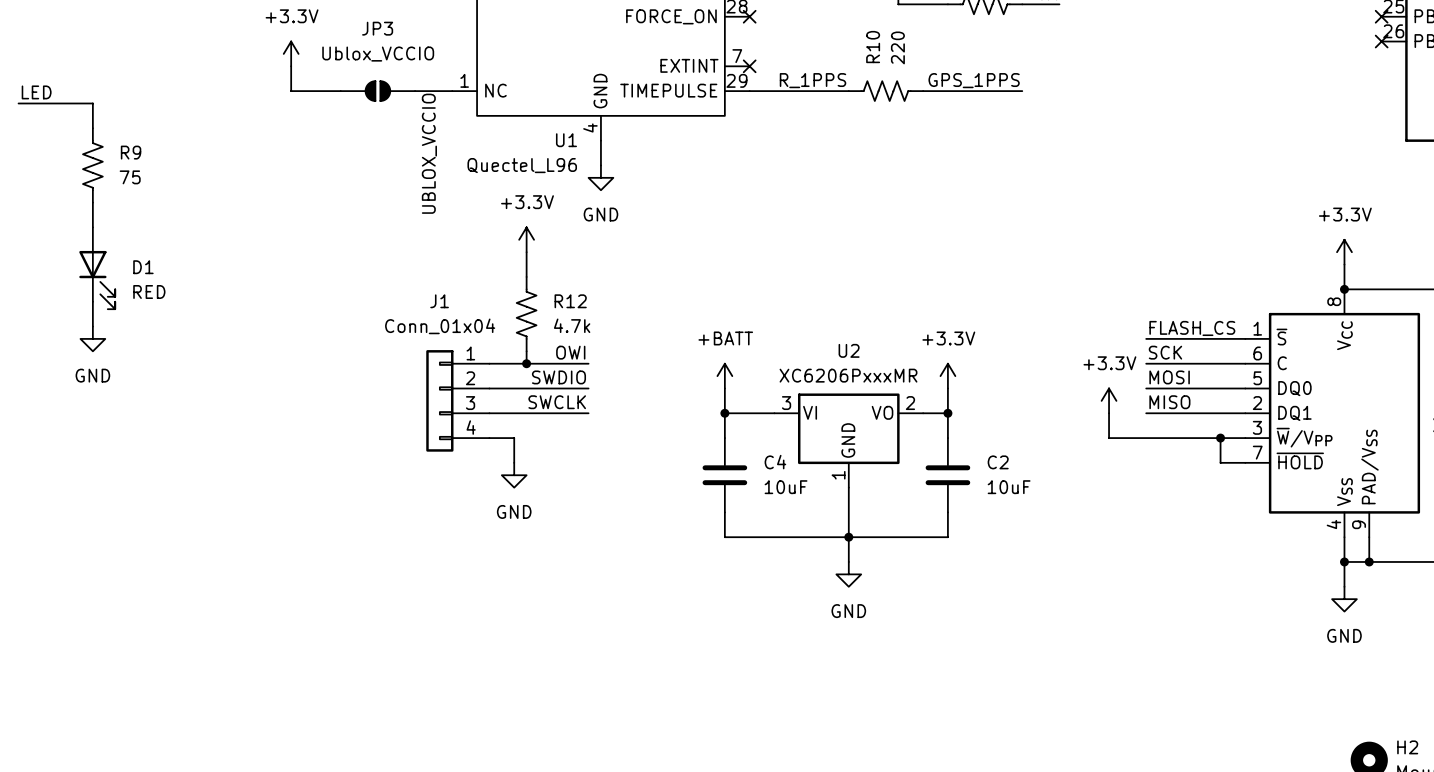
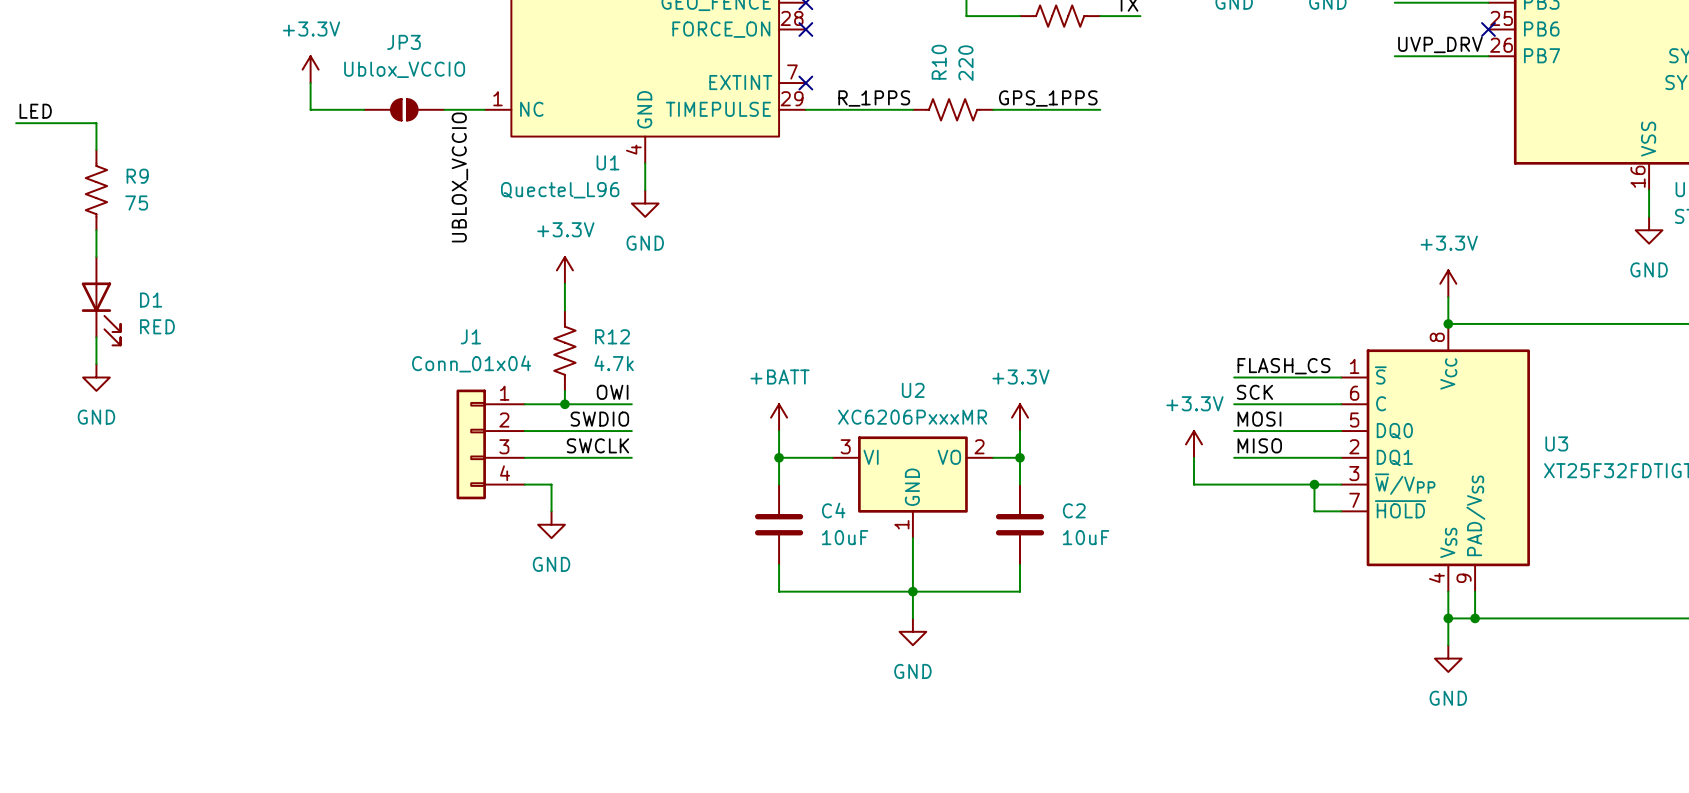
label: none -> UVP_DRV (1440, 44)
wire: none -> (1394, 56) (1488, 56)
no-connect mark: (1381, 41) -> none

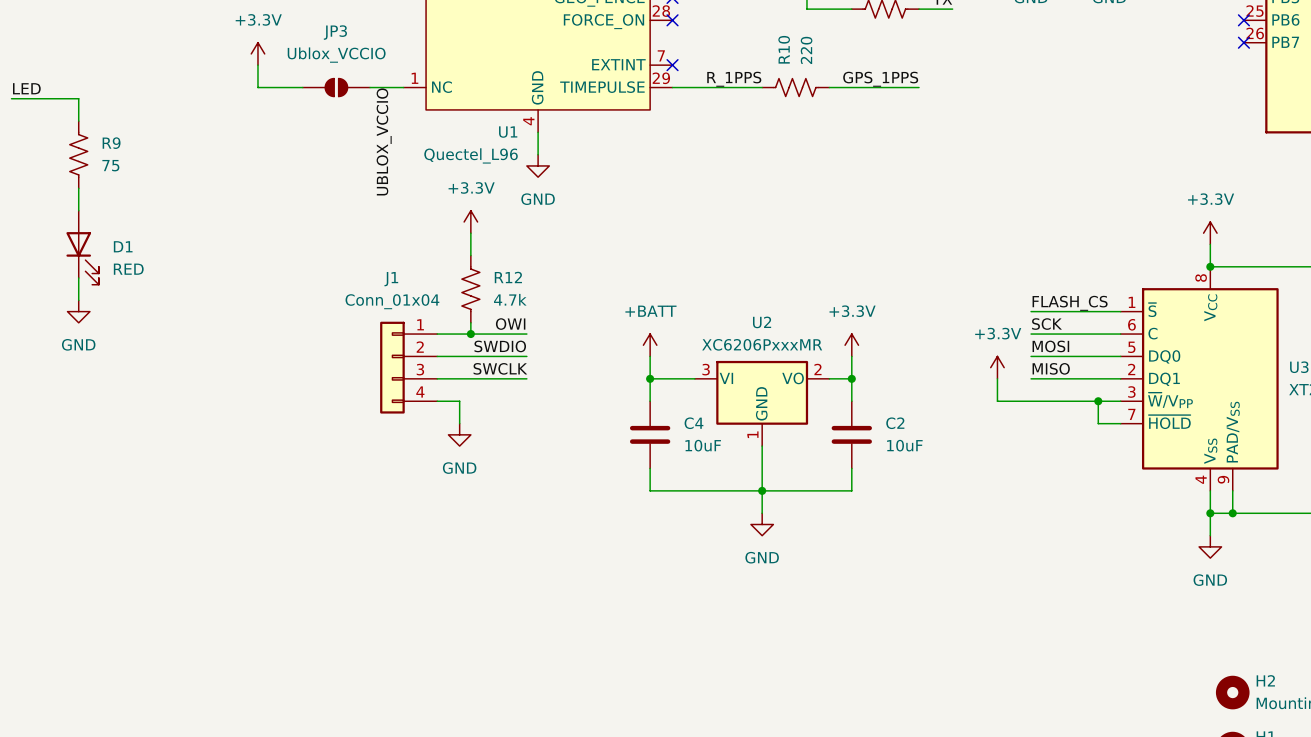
label: UVP_DRV (1440, 44) -> none
wire: (1394, 56) (1488, 56) -> none
no-connect mark: none -> (1243, 42)

